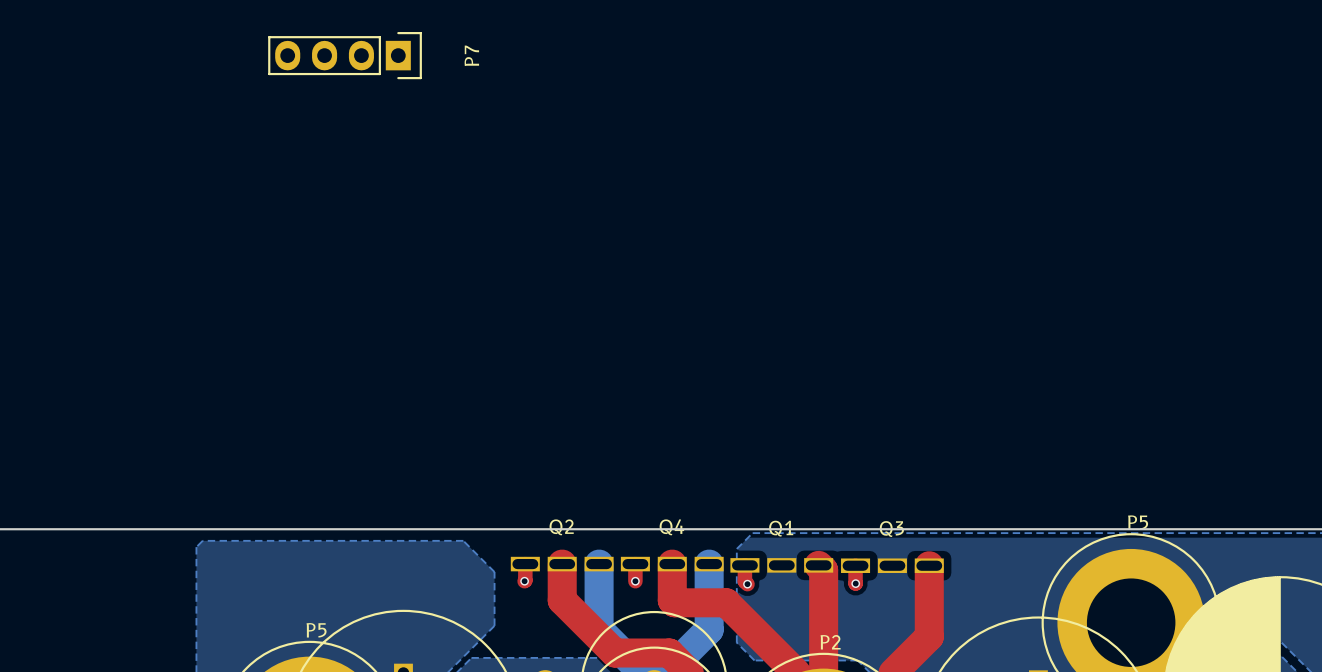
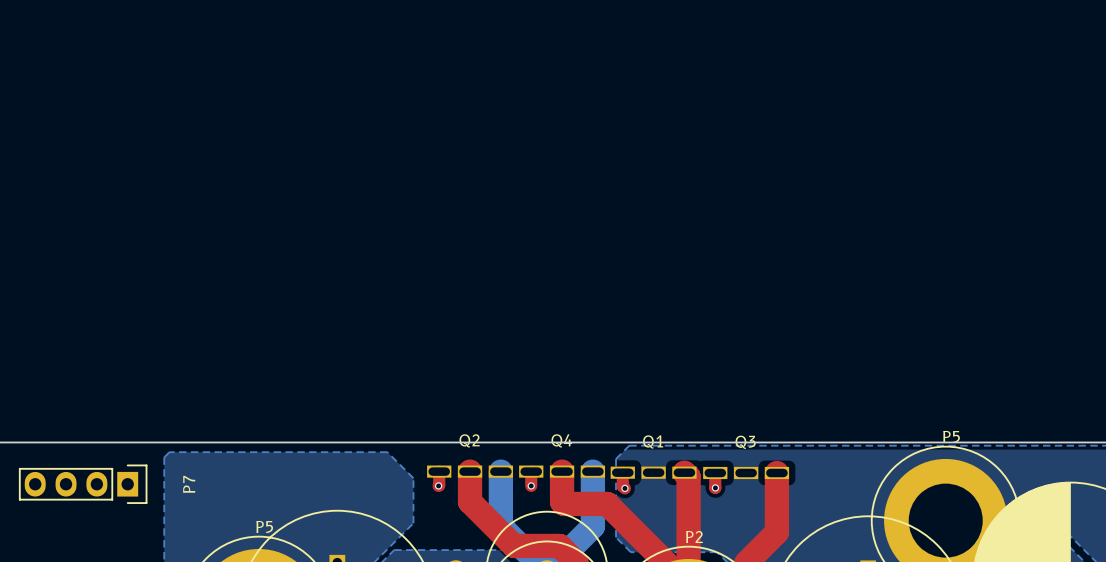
P7 position: (345, 55) -> (83, 484)

